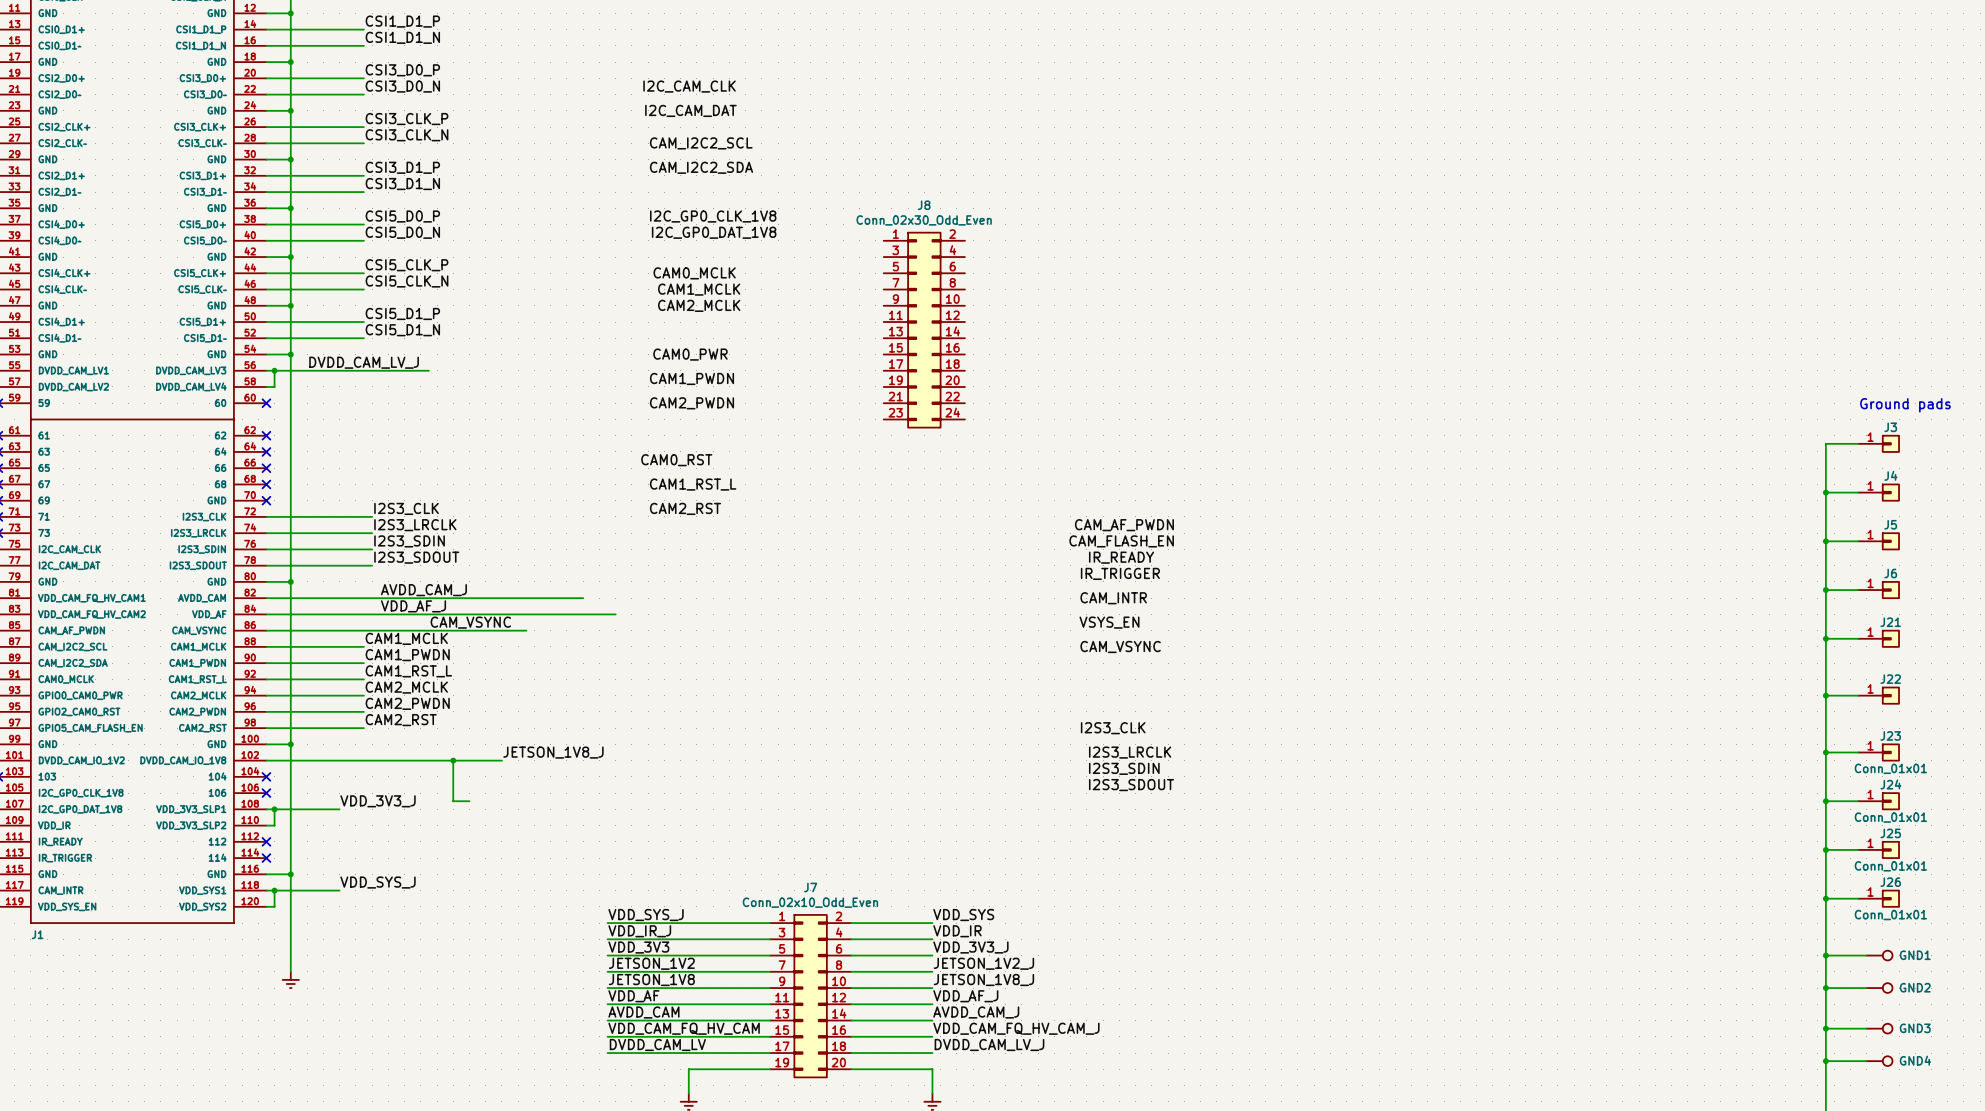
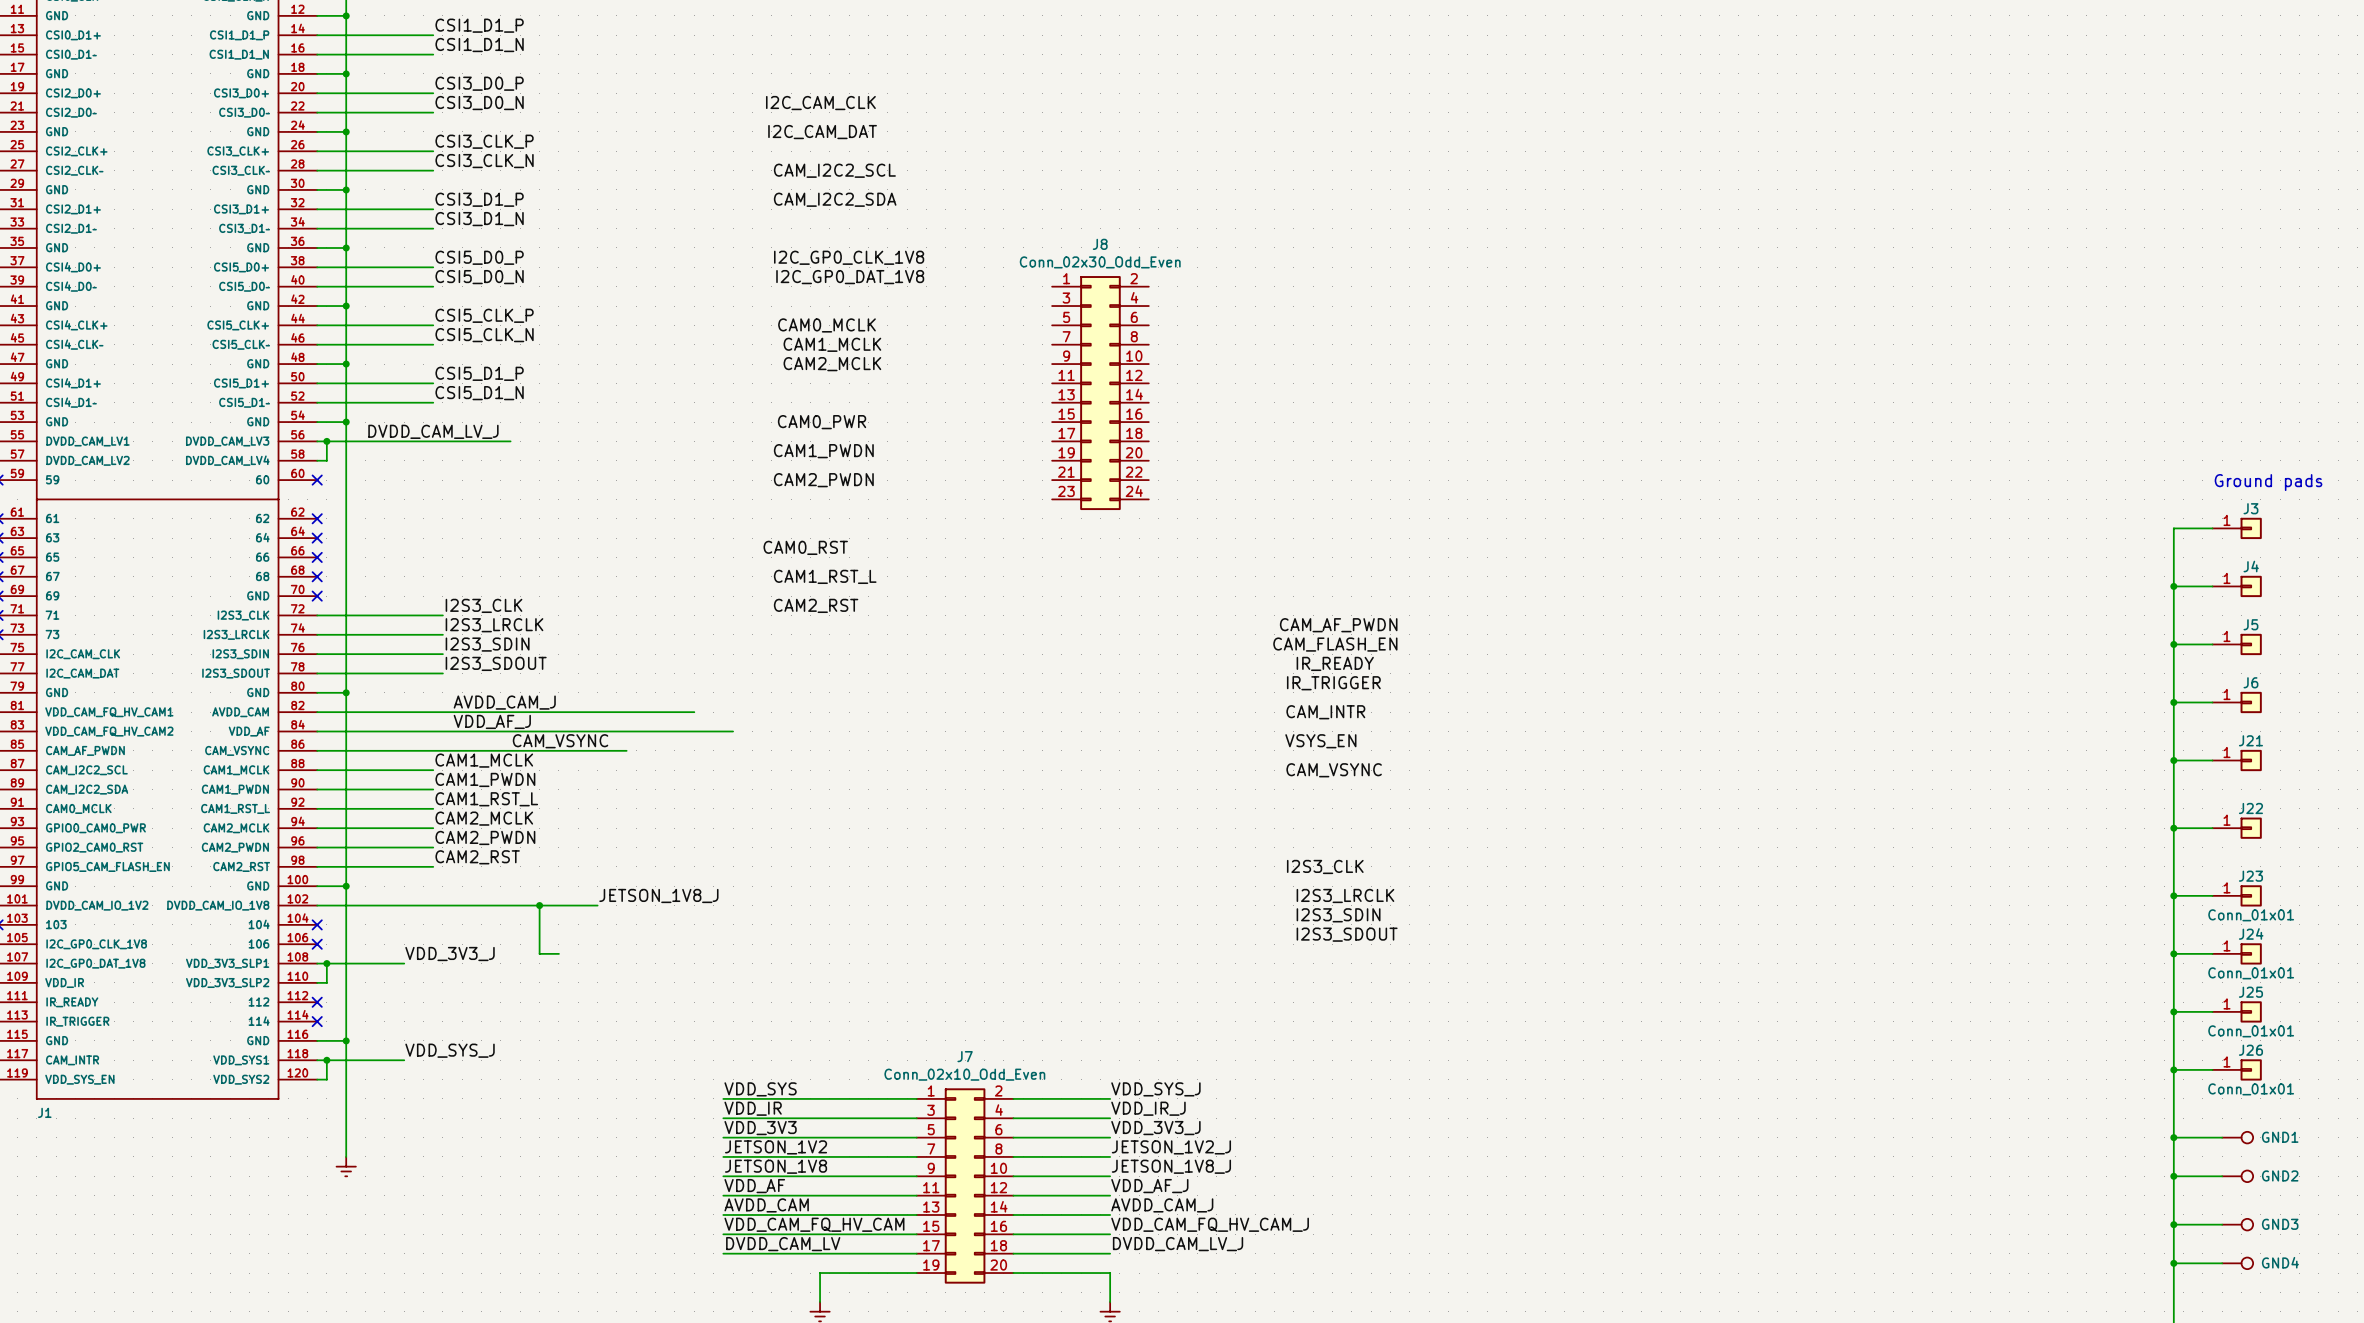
label: VDD_SYS_J (646, 915) -> VDD_SYS (760, 1089)
label: VDD_SYS (963, 915) -> VDD_SYS_J (1155, 1089)
label: VDD_IR_J (639, 931) -> VDD_IR (753, 1108)
label: VDD_IR (957, 931) -> VDD_IR_J (1148, 1108)

